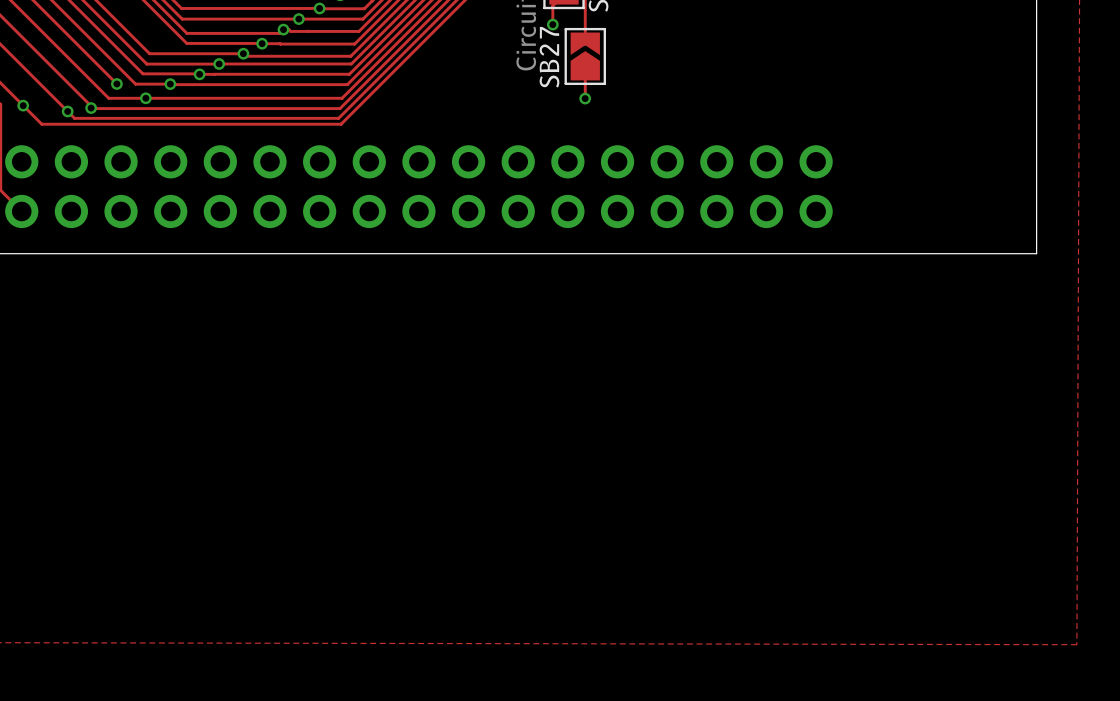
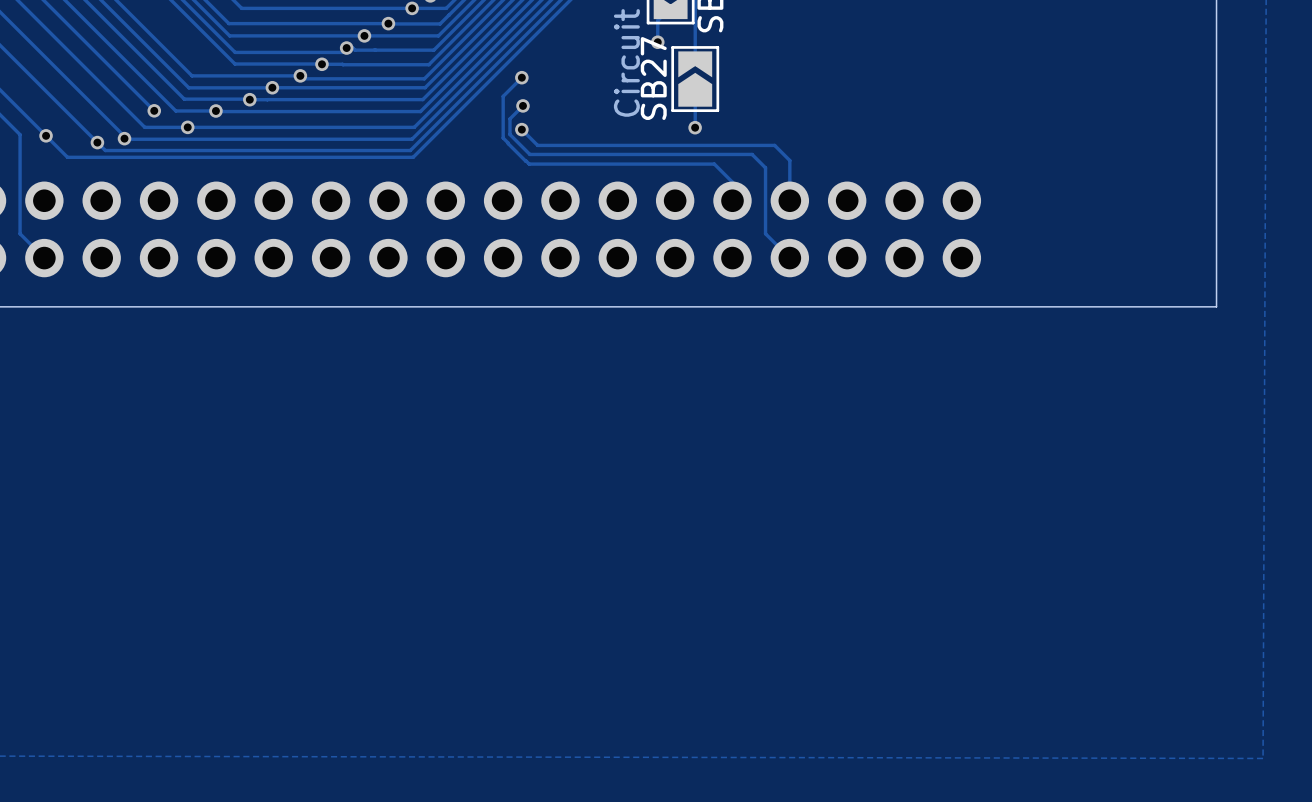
track: none -> (521, 77) (503, 96) (503, 138) (529, 164) (714, 164) (732, 182) (732, 200)
via: none -> (521, 77)
track: none -> (522, 105) (509, 118) (509, 134) (529, 154) (752, 154) (765, 167) (765, 233) (789, 258)
via: none -> (522, 105)
track: none -> (521, 129) (537, 145) (774, 145) (789, 160) (789, 200)
via: none -> (521, 129)

